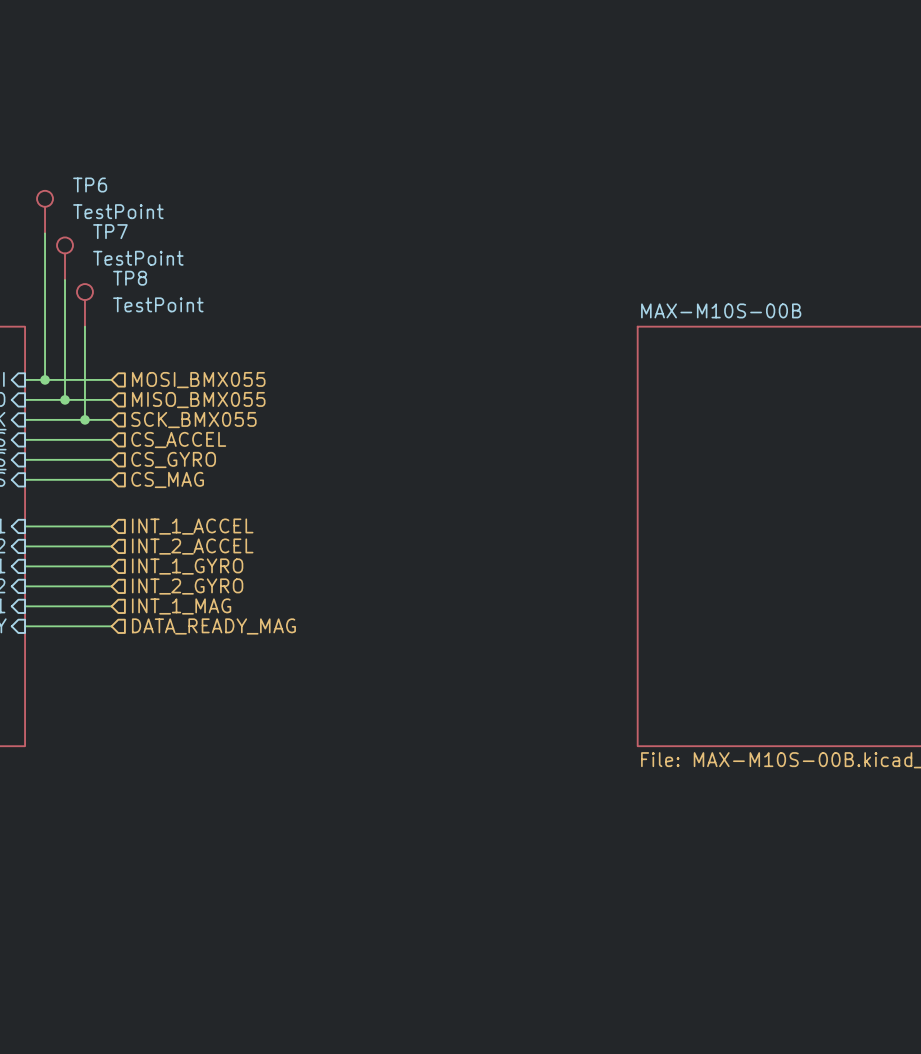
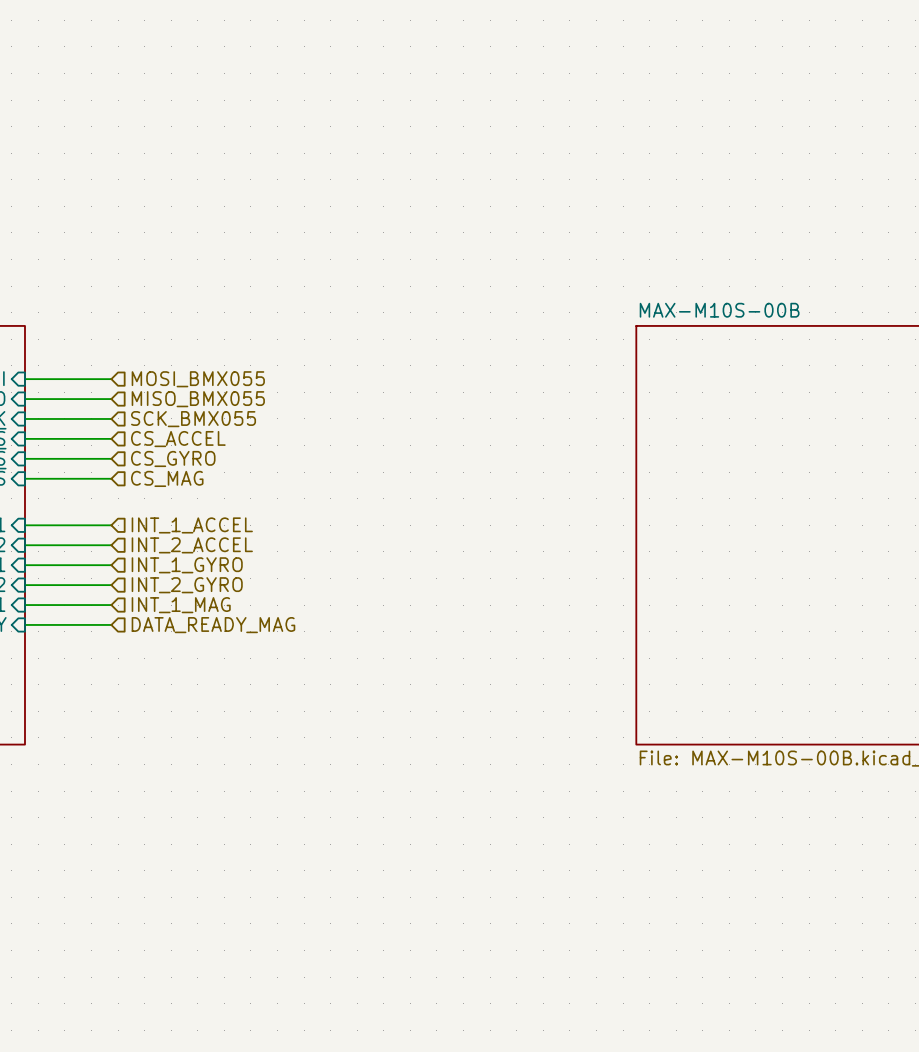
TP6: TestPoint (45, 212) -> none
wire: (45, 233) (45, 379) -> none
TP7: TestPoint (65, 258) -> none
wire: (65, 280) (65, 399) -> none
TP8: TestPoint (84, 305) -> none
wire: (84, 326) (84, 419) -> none
junction: (45, 379) -> none
junction: (65, 399) -> none
junction: (84, 419) -> none

